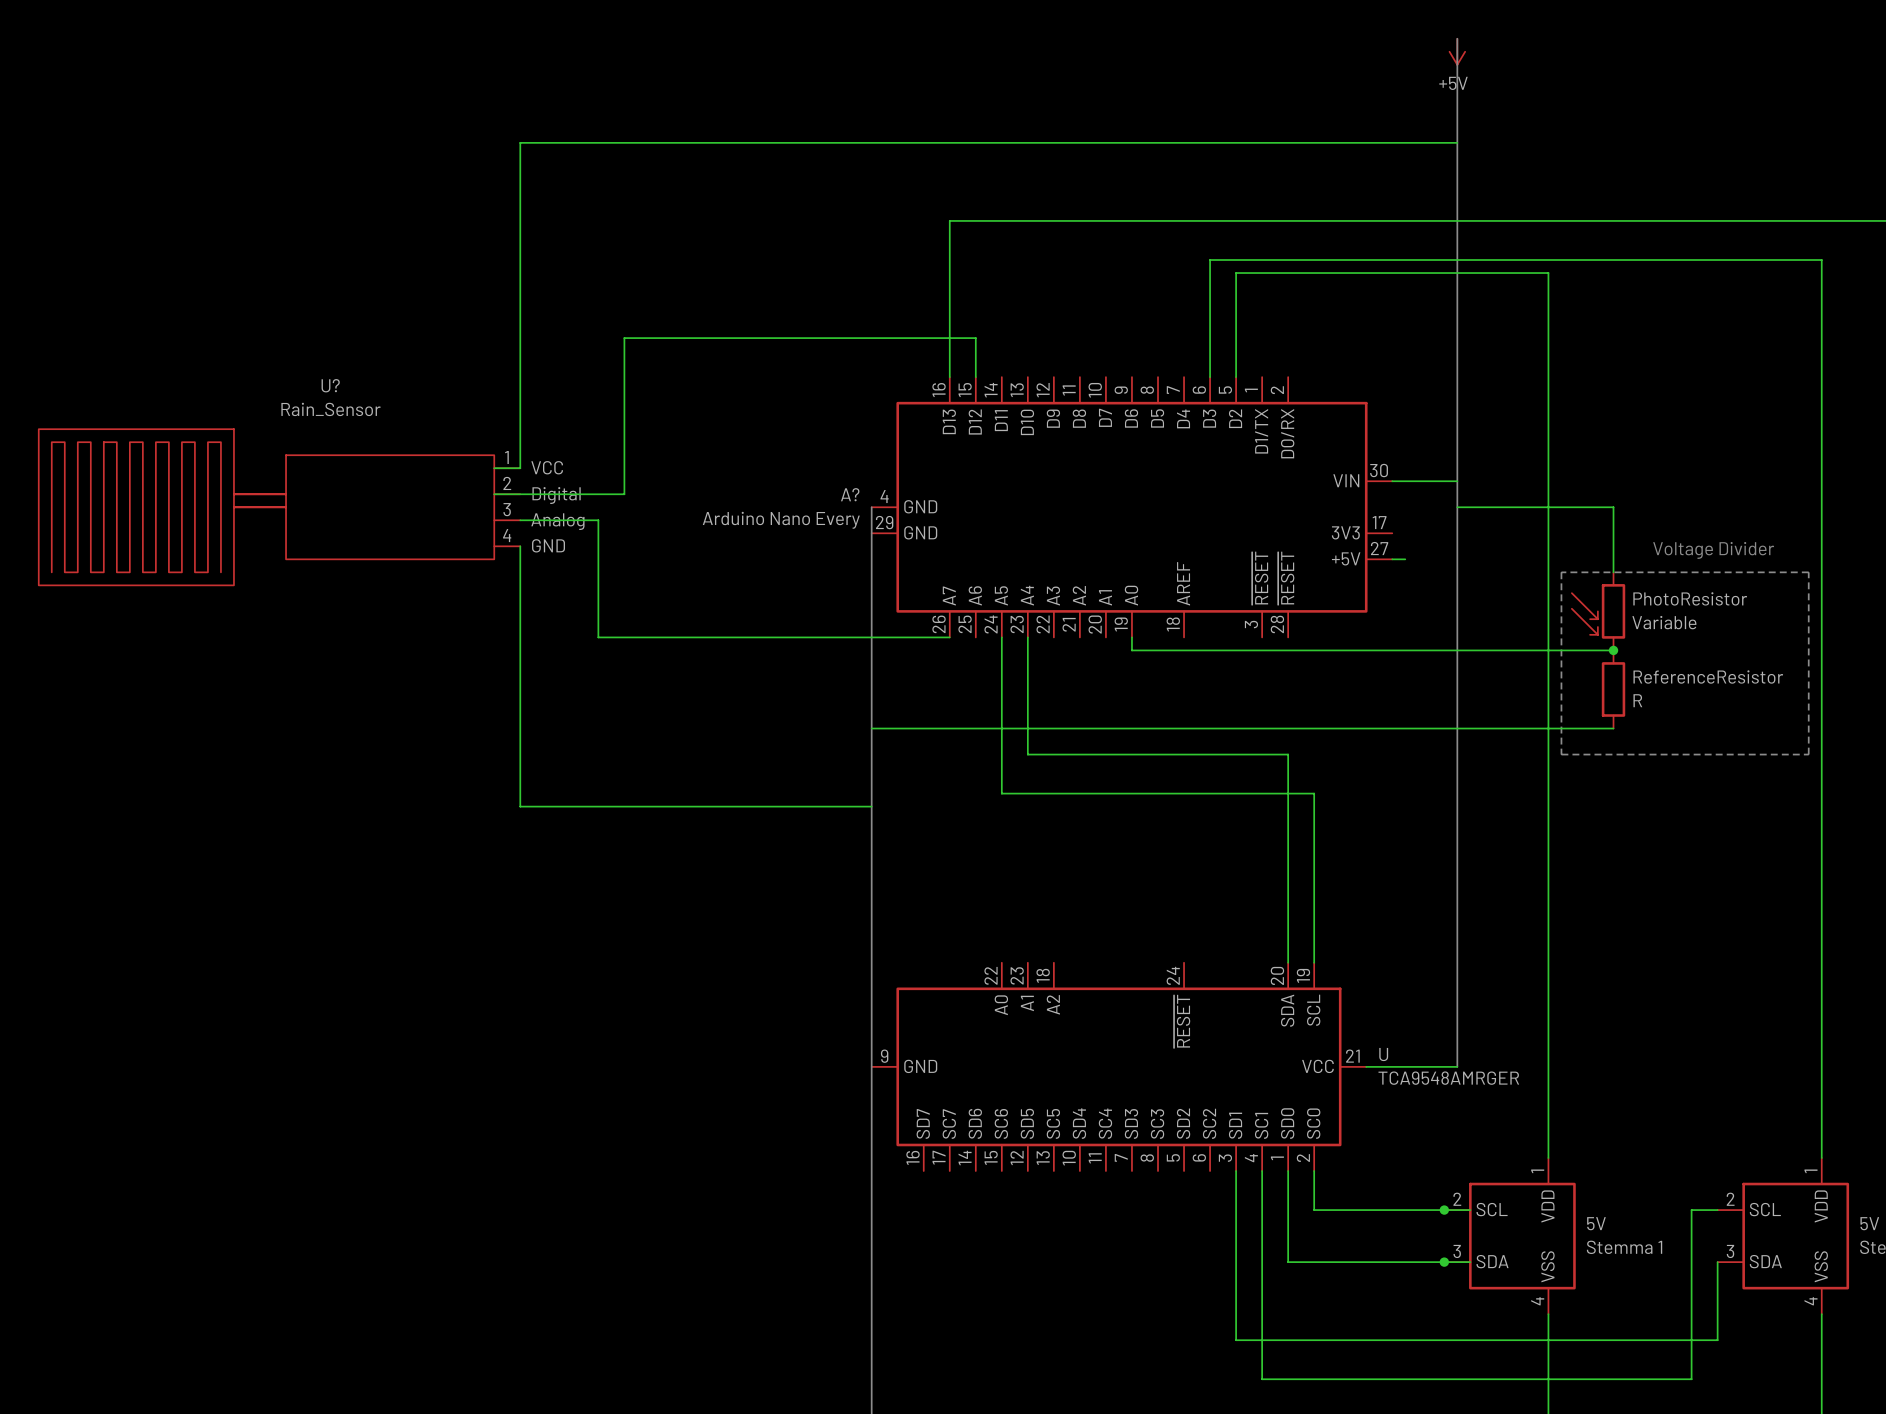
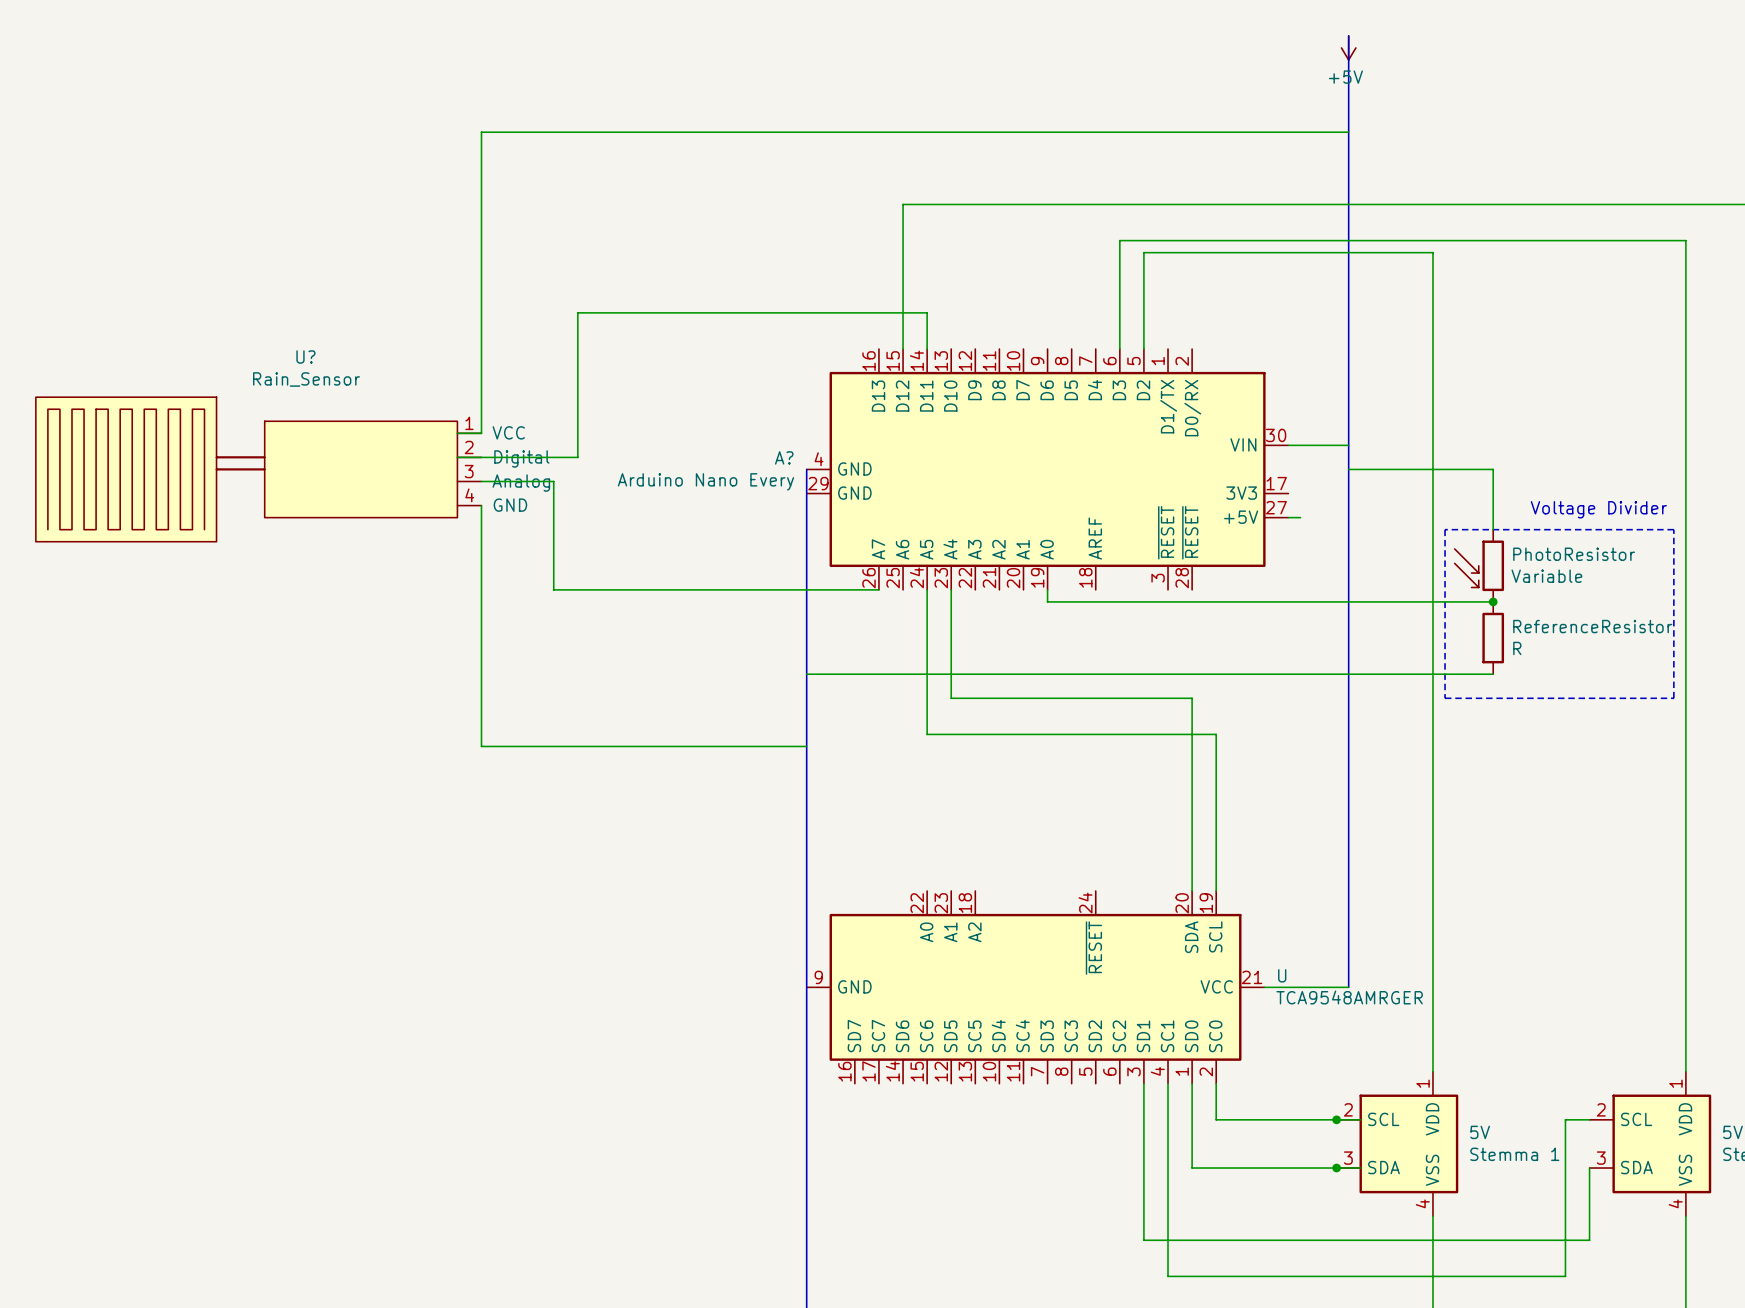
wire: (975, 220) (949, 220) (949, 377) -> (903, 204) (903, 312) (927, 312) (927, 349)

